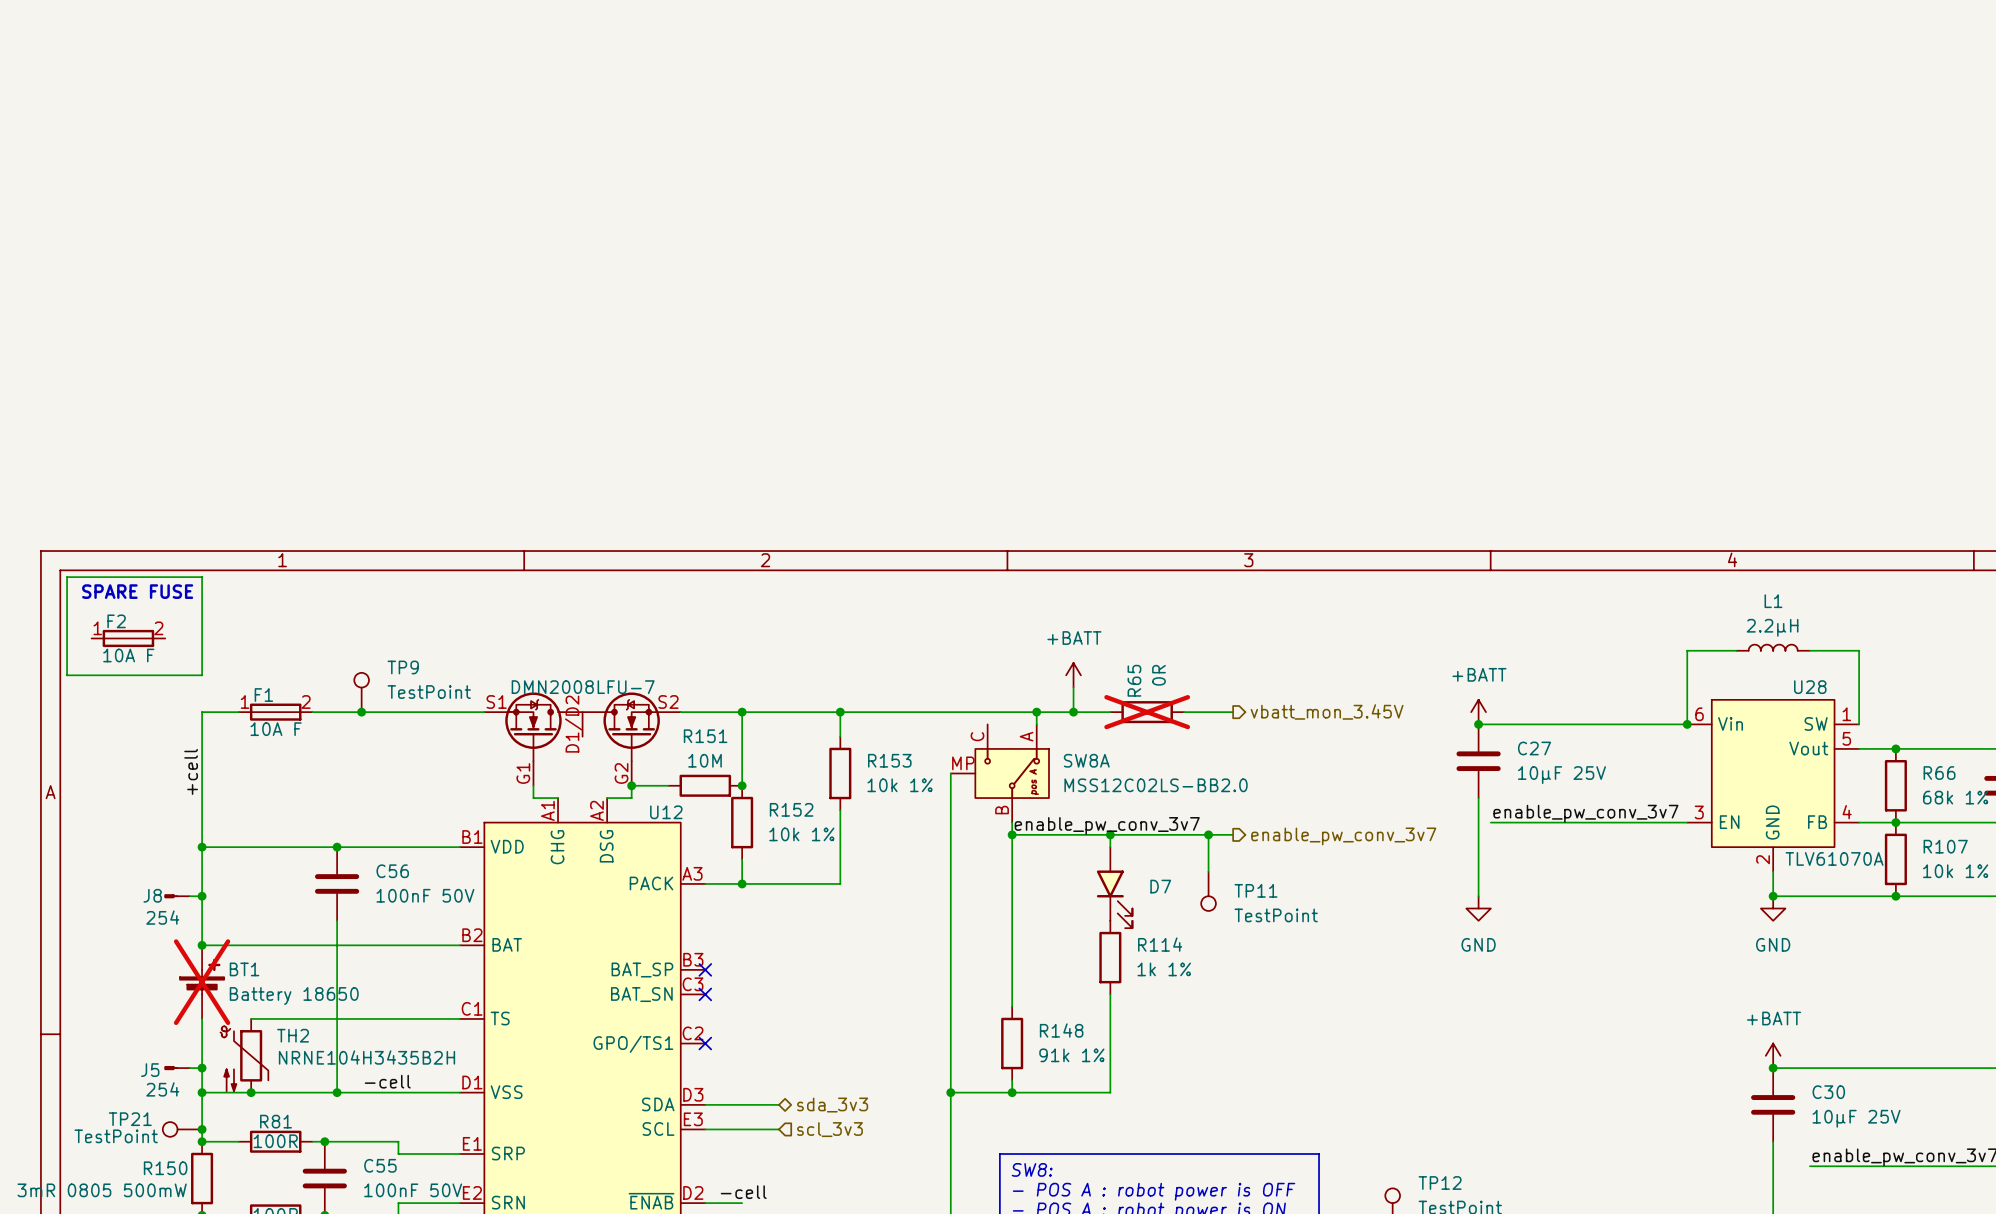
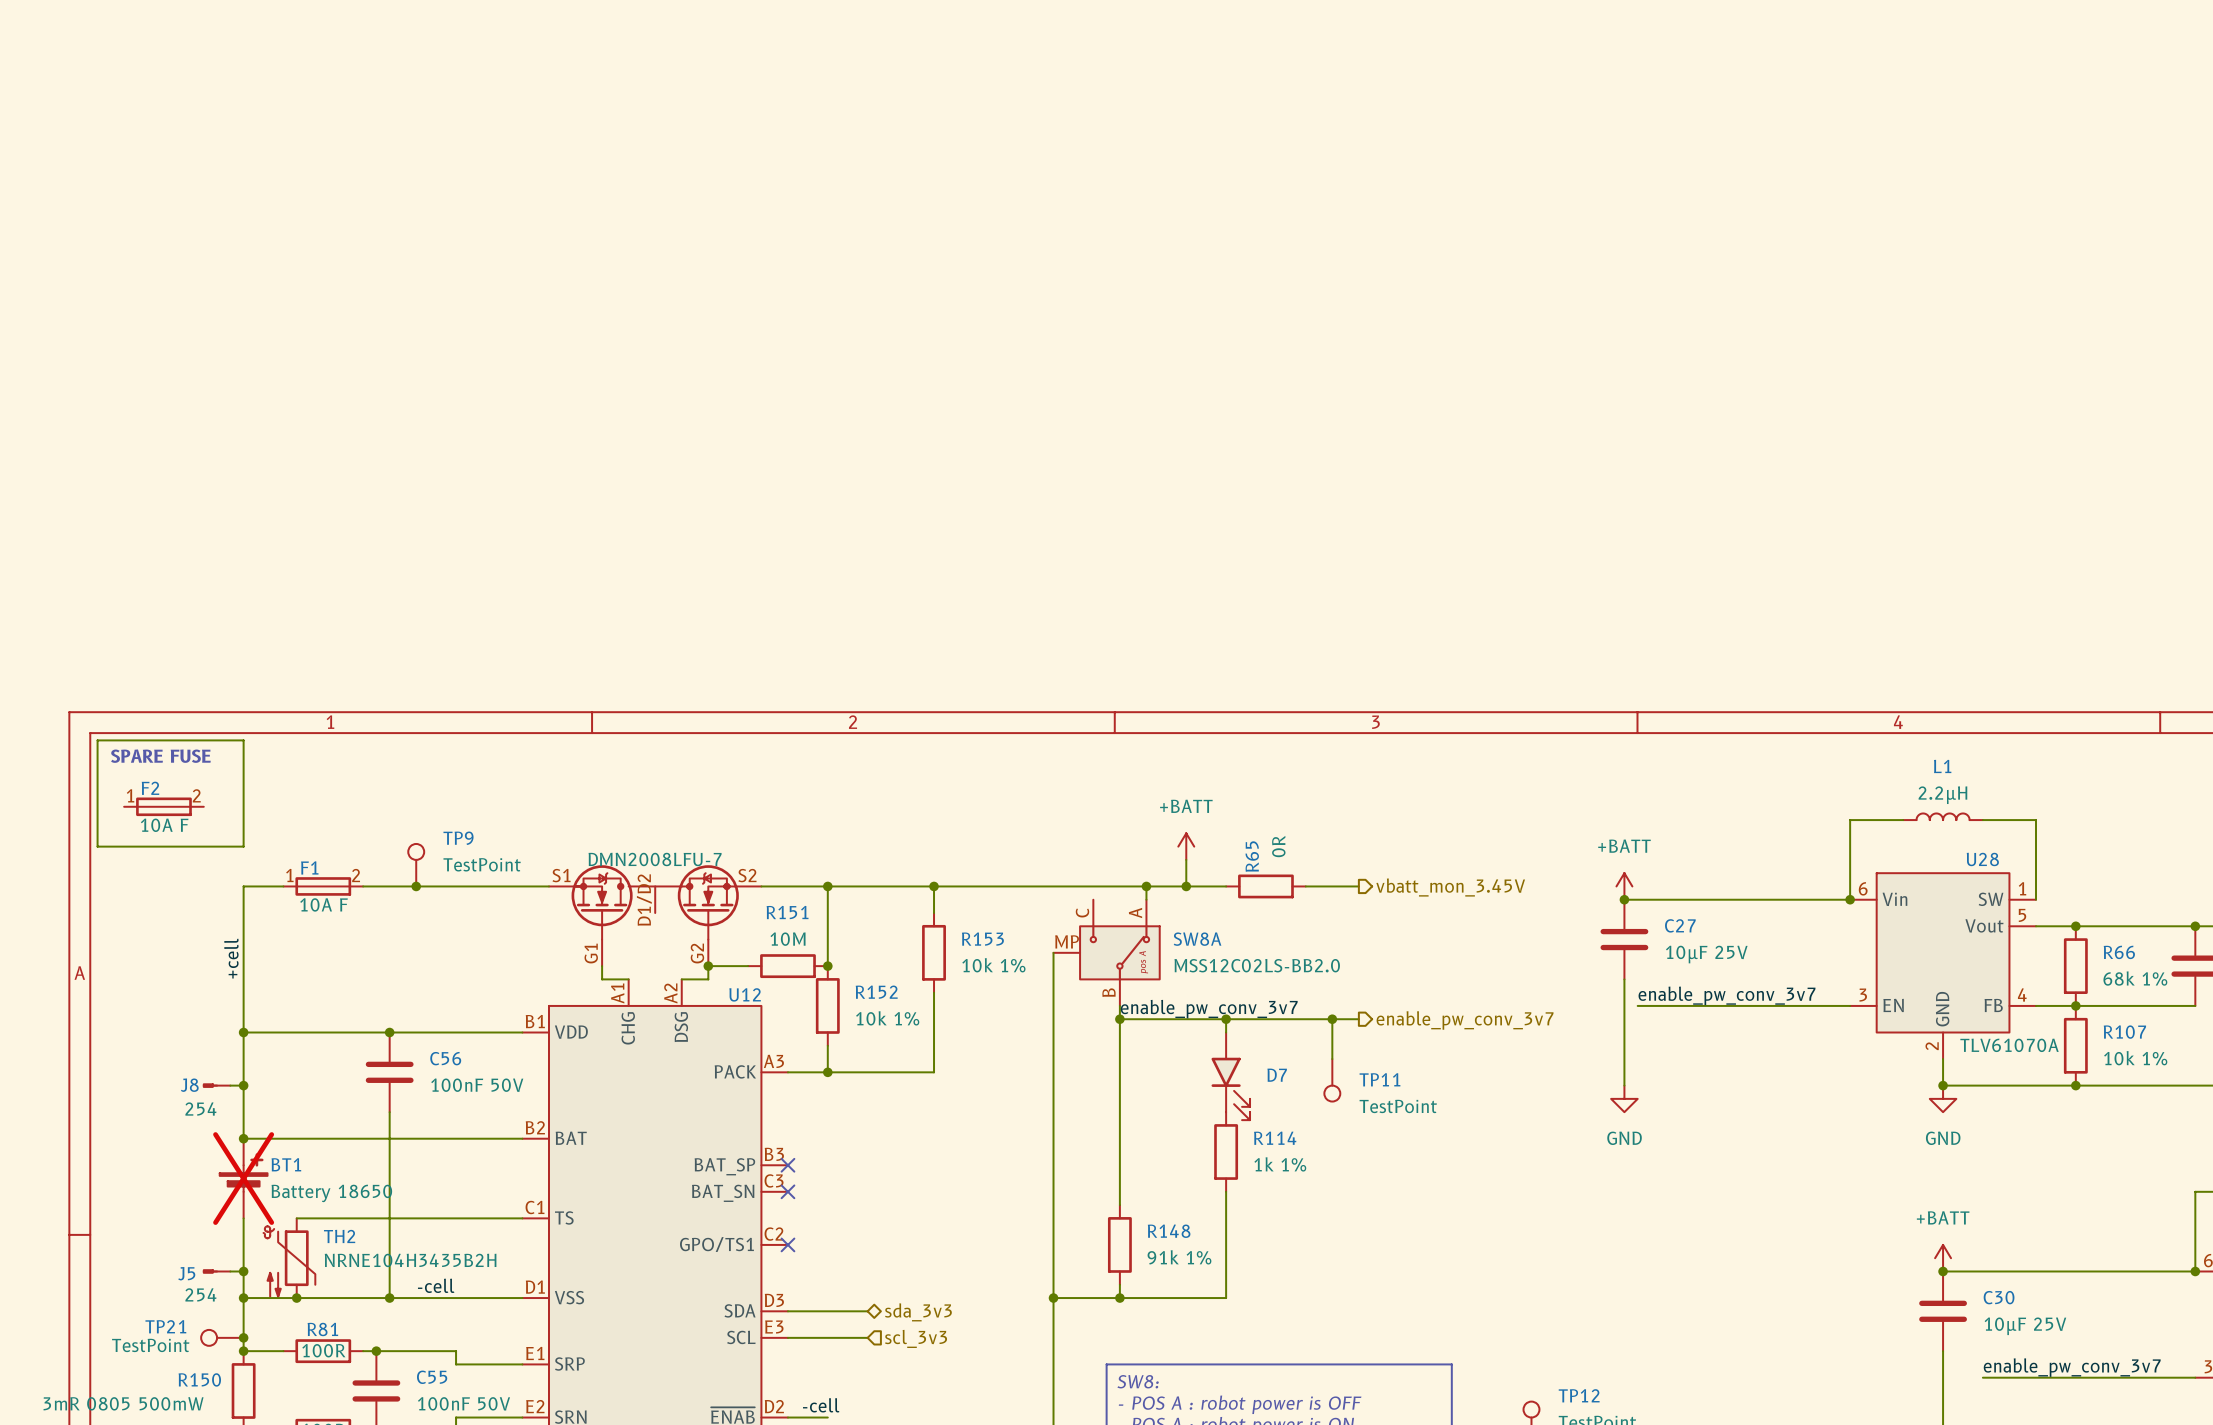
R65 do-not-place cross: (1147, 712) -> none

